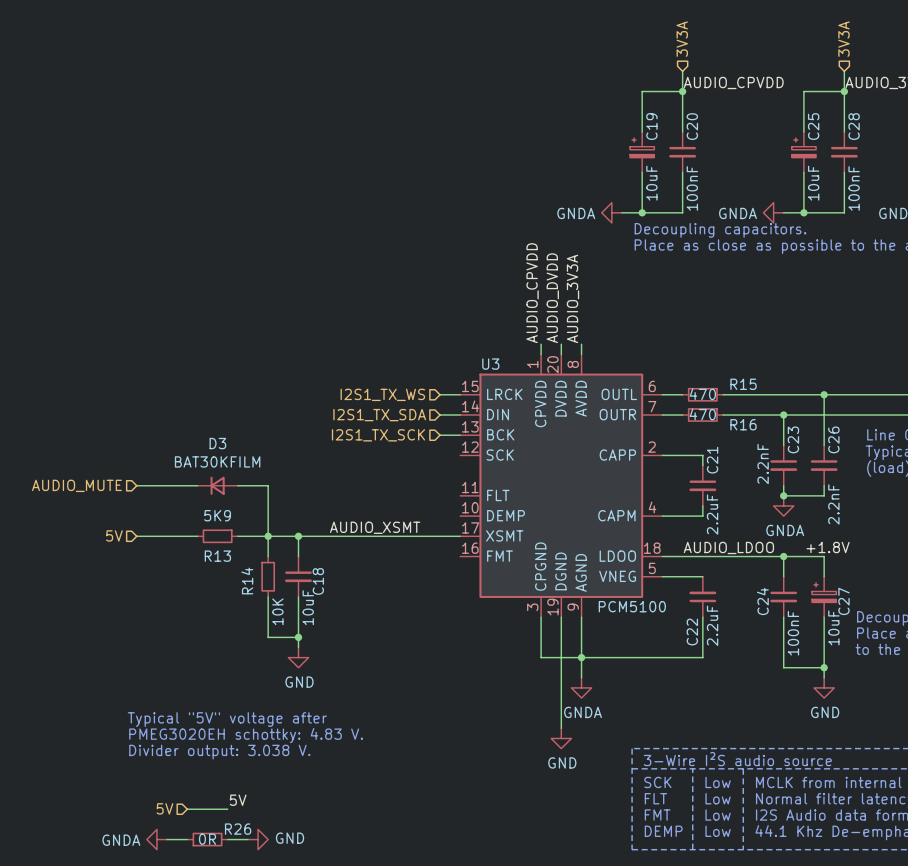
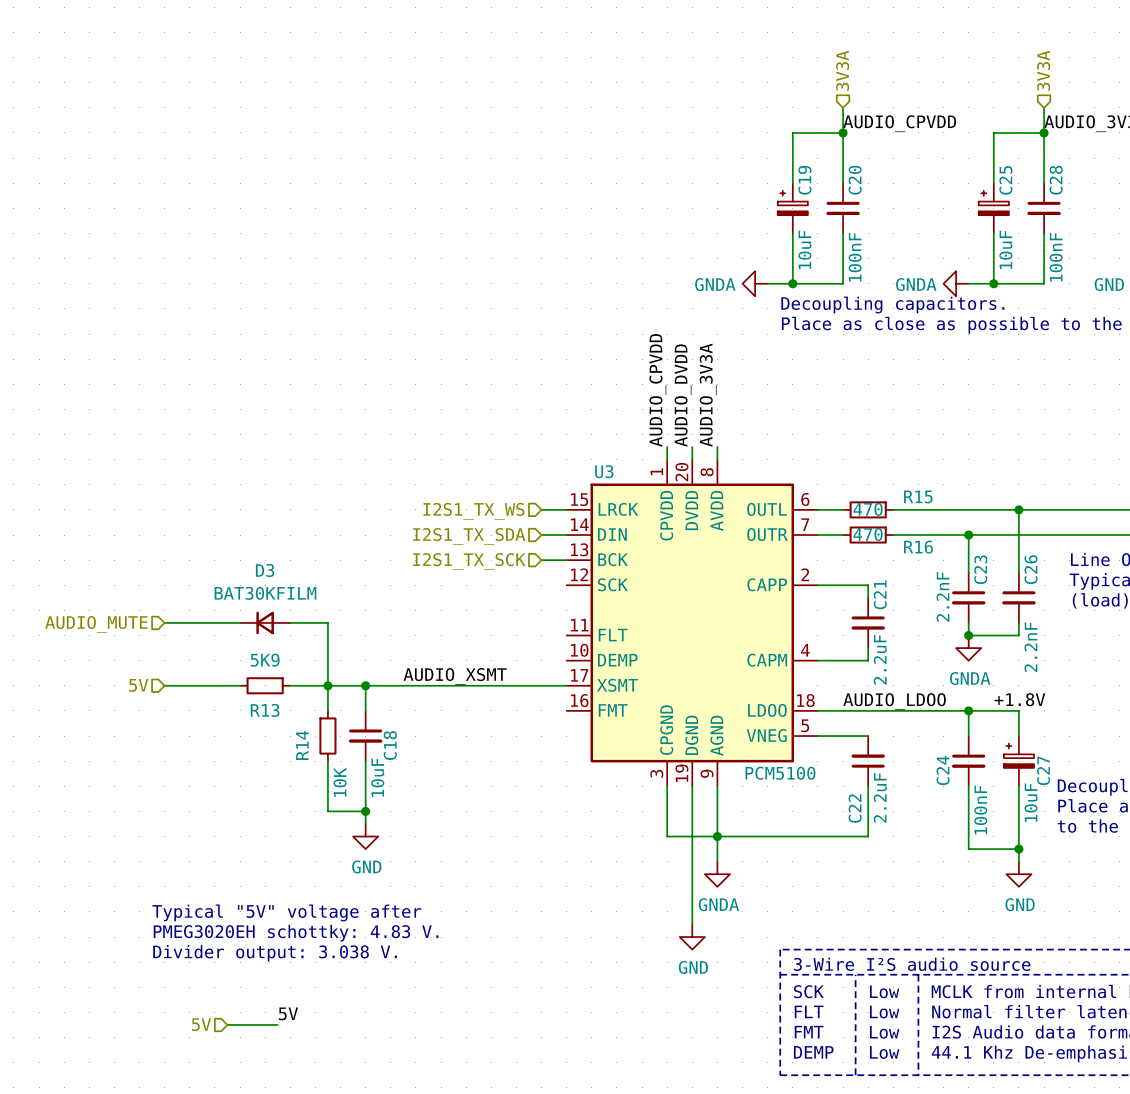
power symbol: GNDA (156, 839) -> none
wire: (167, 839) (187, 839) -> none
R26: 0R (207, 839) -> none
wire: (227, 839) (247, 839) -> none
power symbol: GND (258, 839) -> none

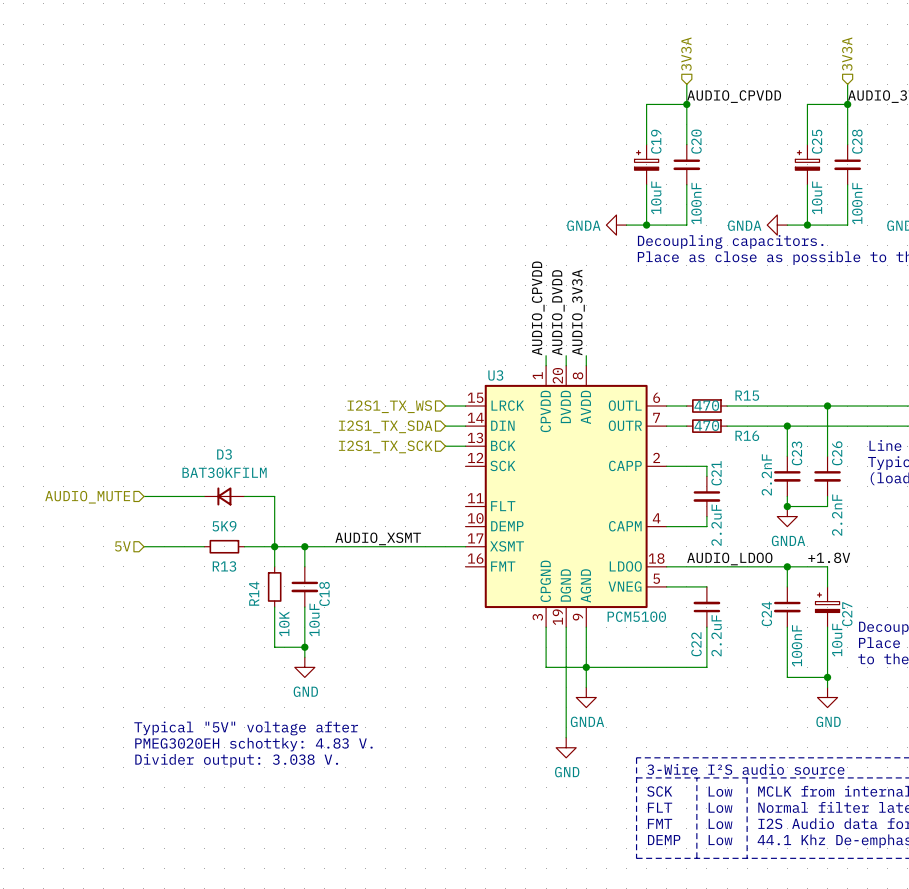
label: 5V (288, 1013) -> none
hierarchical label: 5V (201, 1024) -> none
wire: (227, 1024) (277, 1024) -> none

